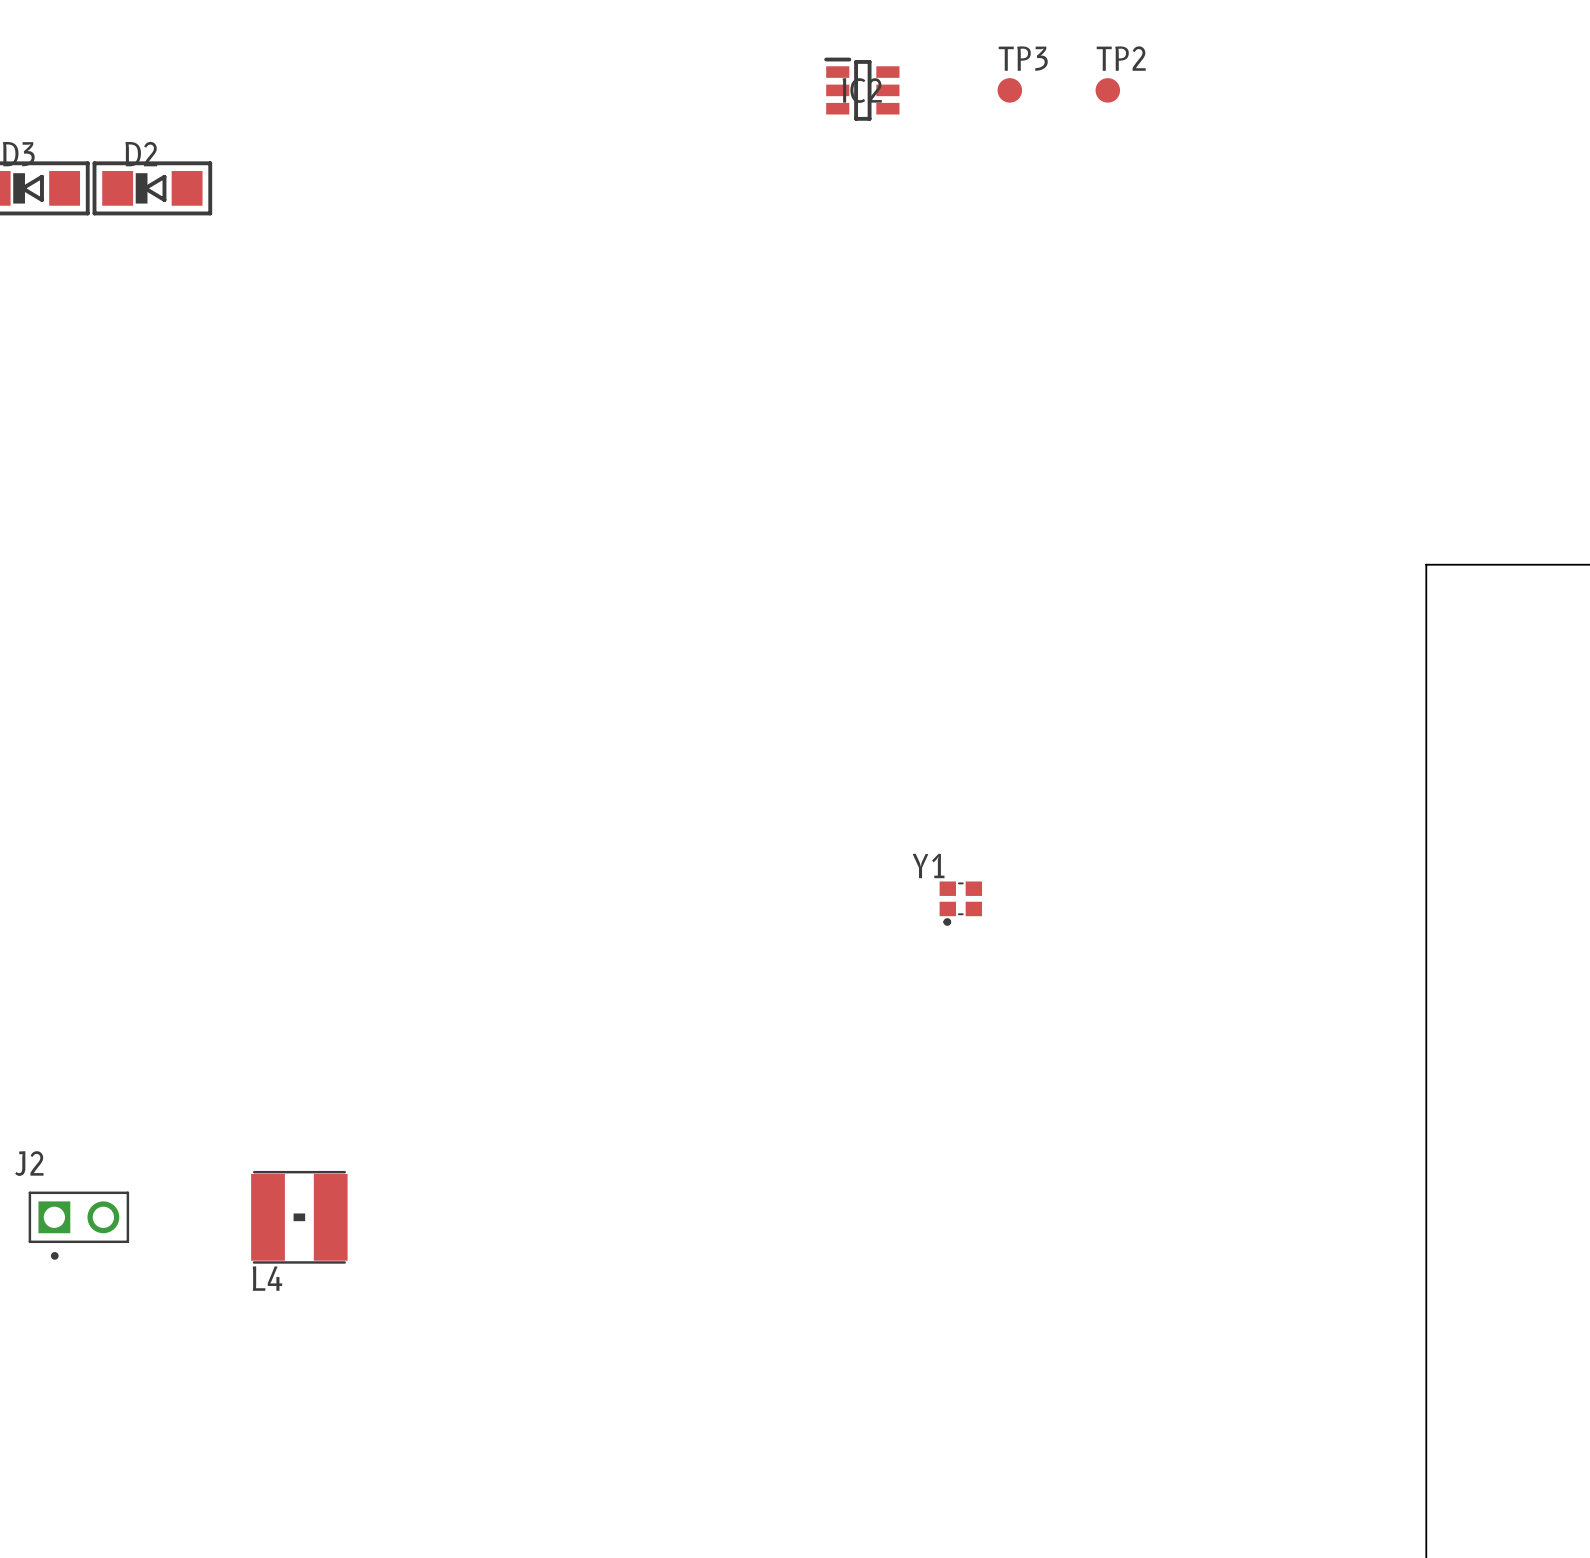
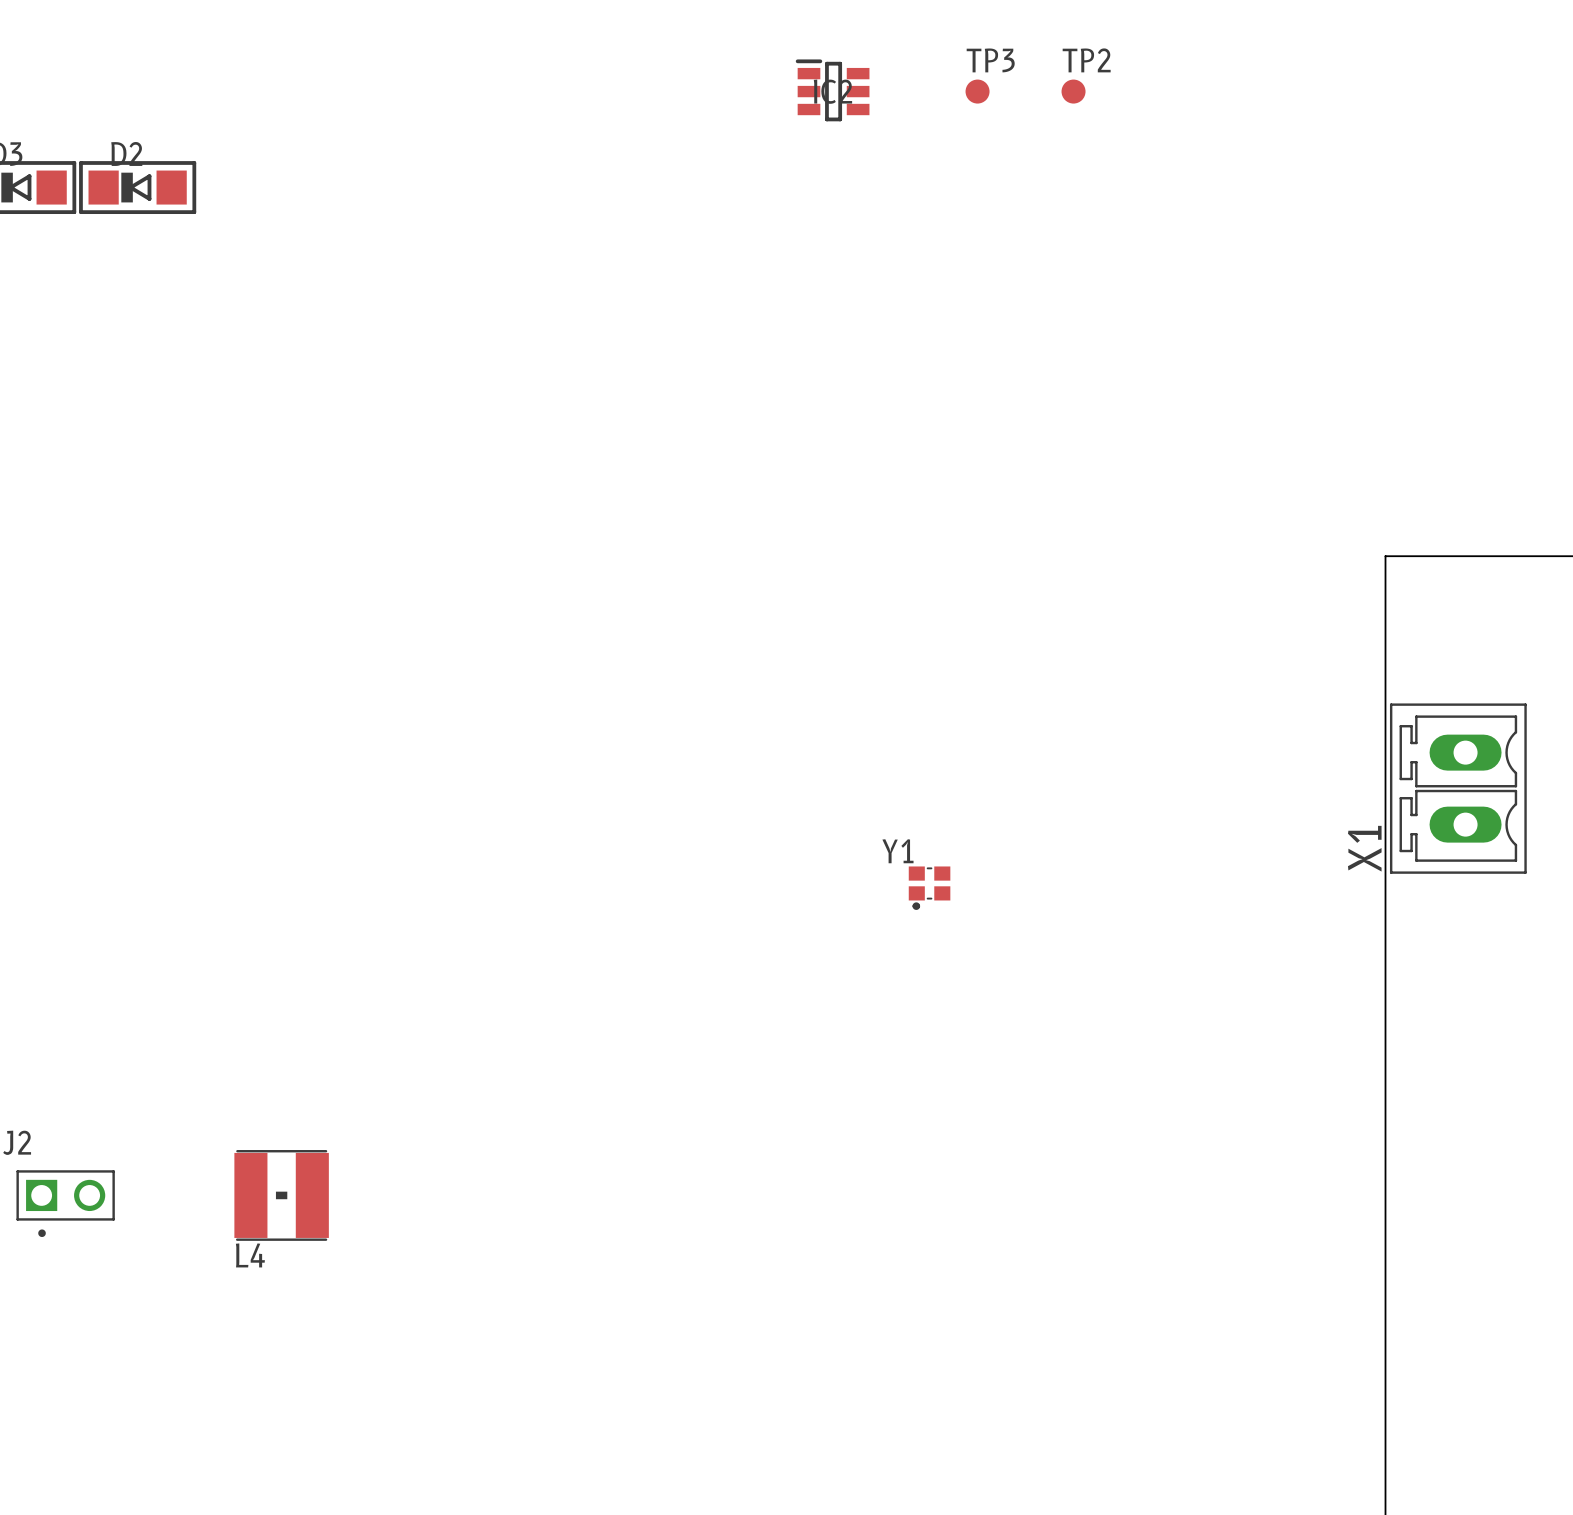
X1: none -> (1458, 788)

